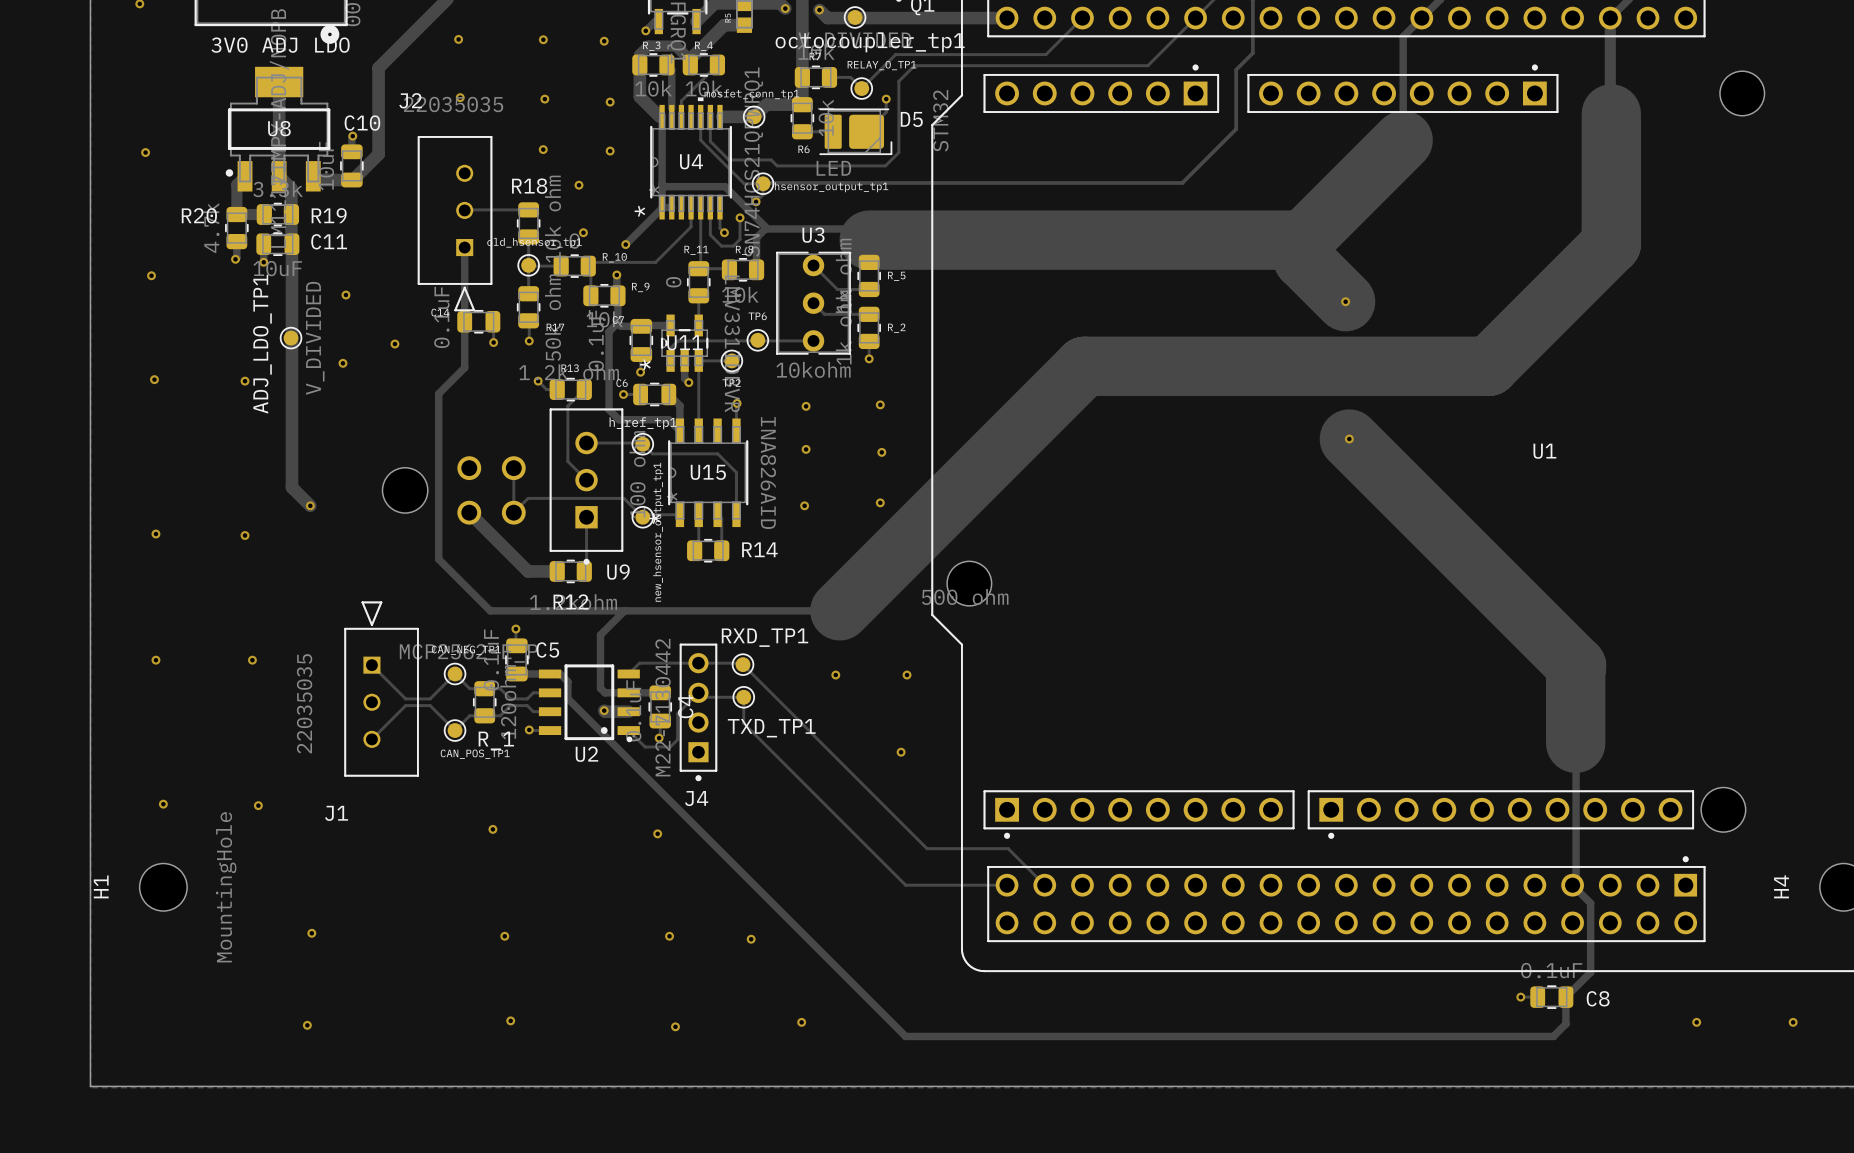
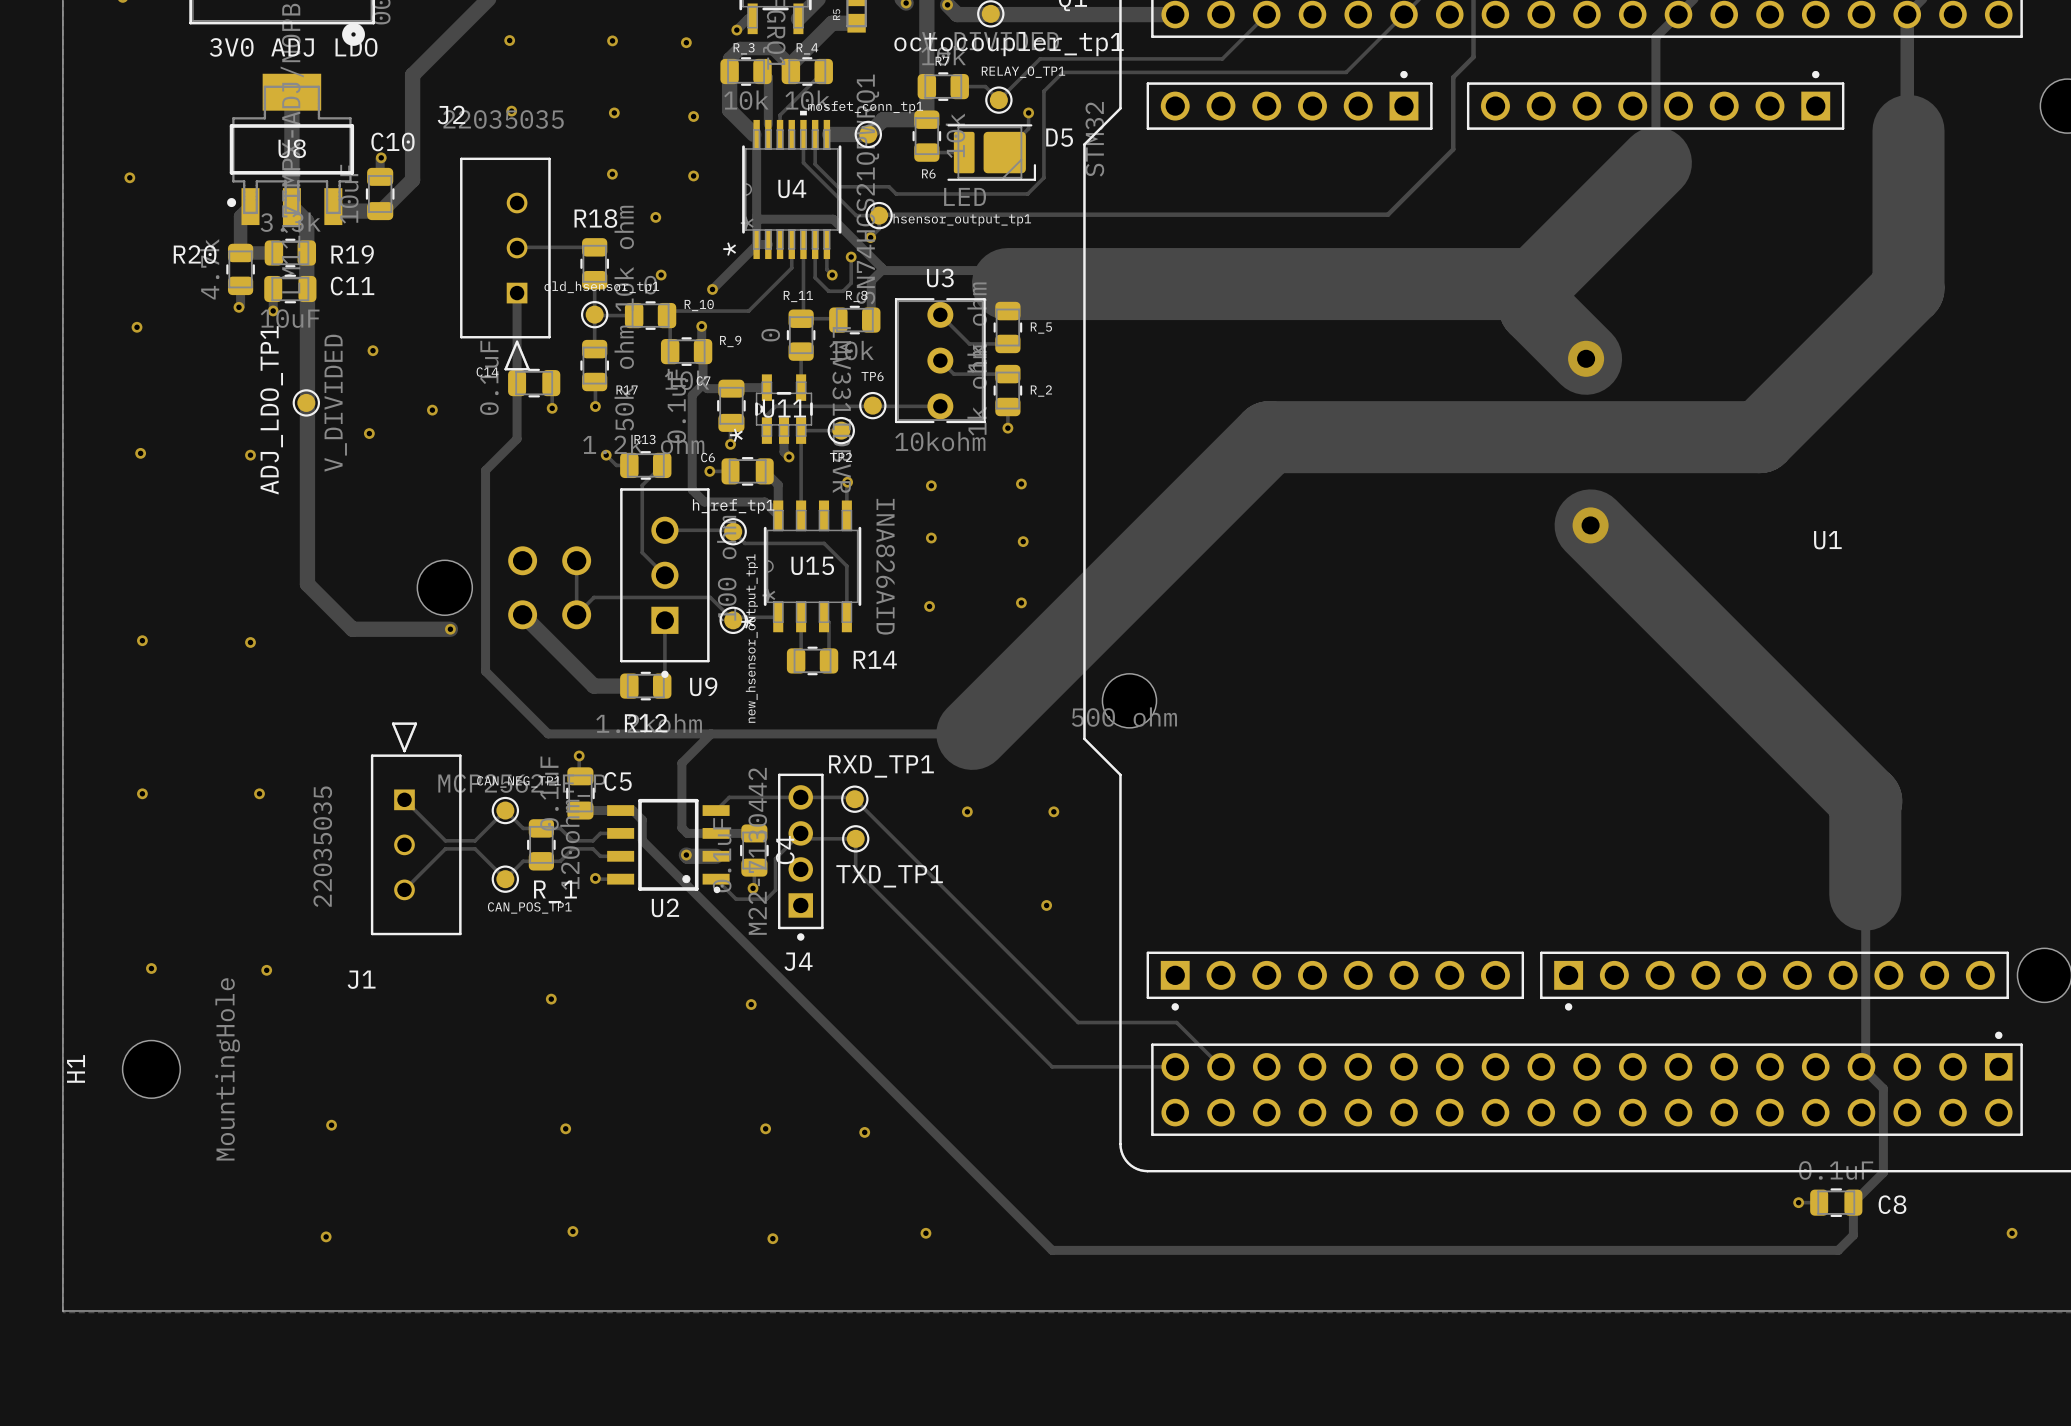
via size: [1341, 297, 1351, 307] -> [1568, 340, 1605, 377]
via size: [1344, 434, 1354, 444] -> [1572, 507, 1609, 544]
track: none -> (329, 606) (352, 629) (450, 629)
via: (310, 505) -> none
via: none -> (450, 629)

